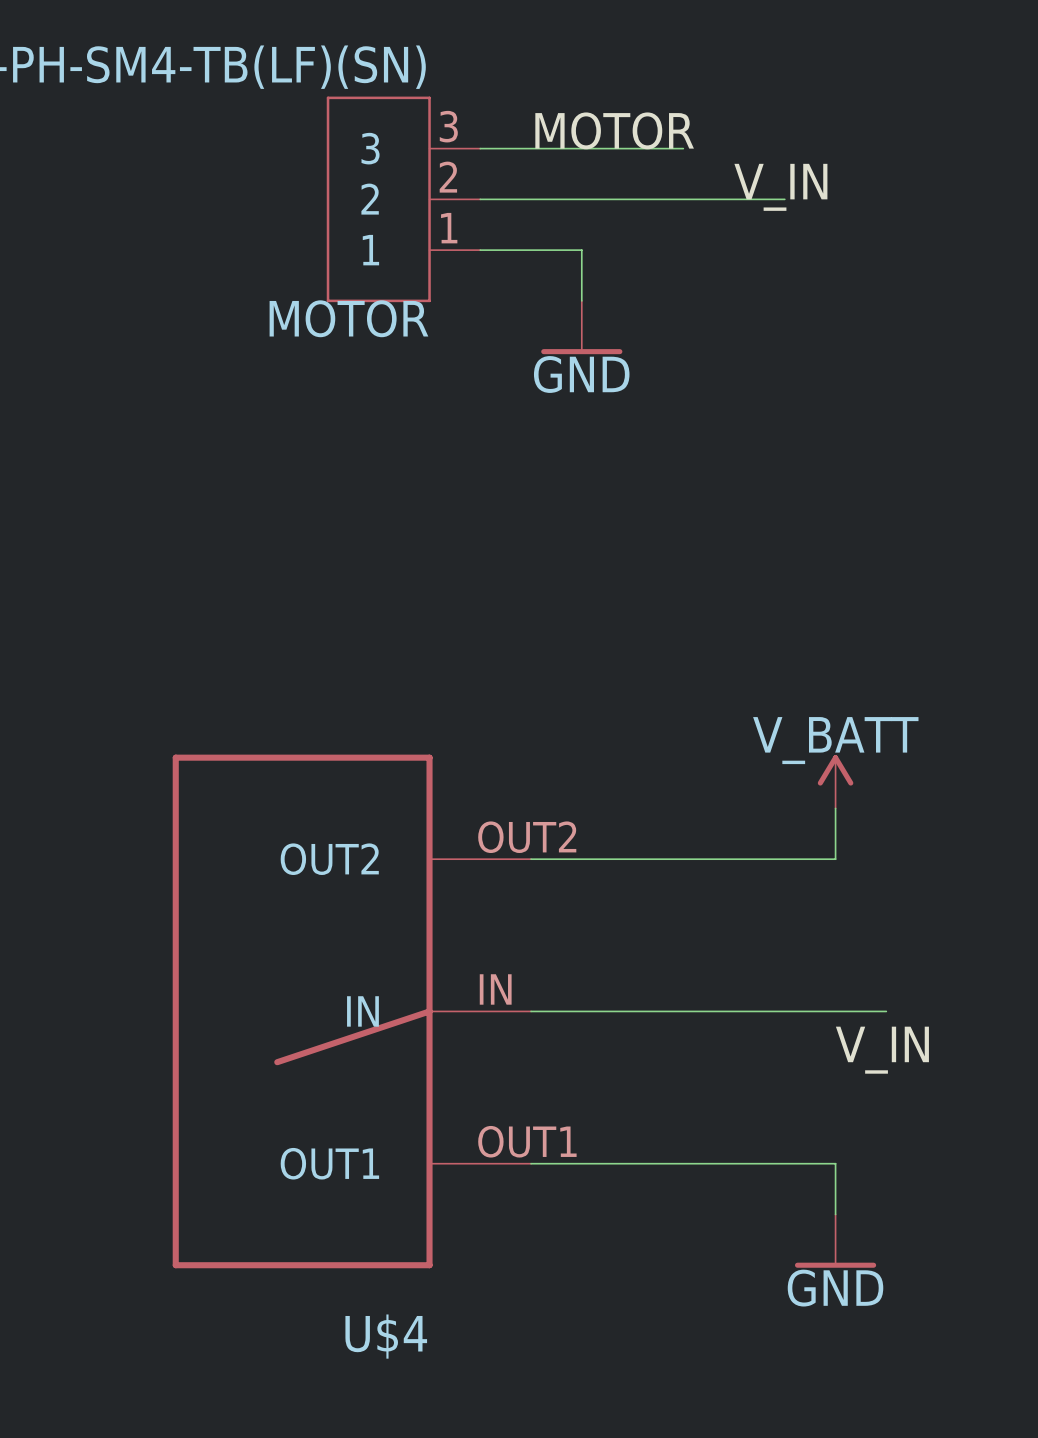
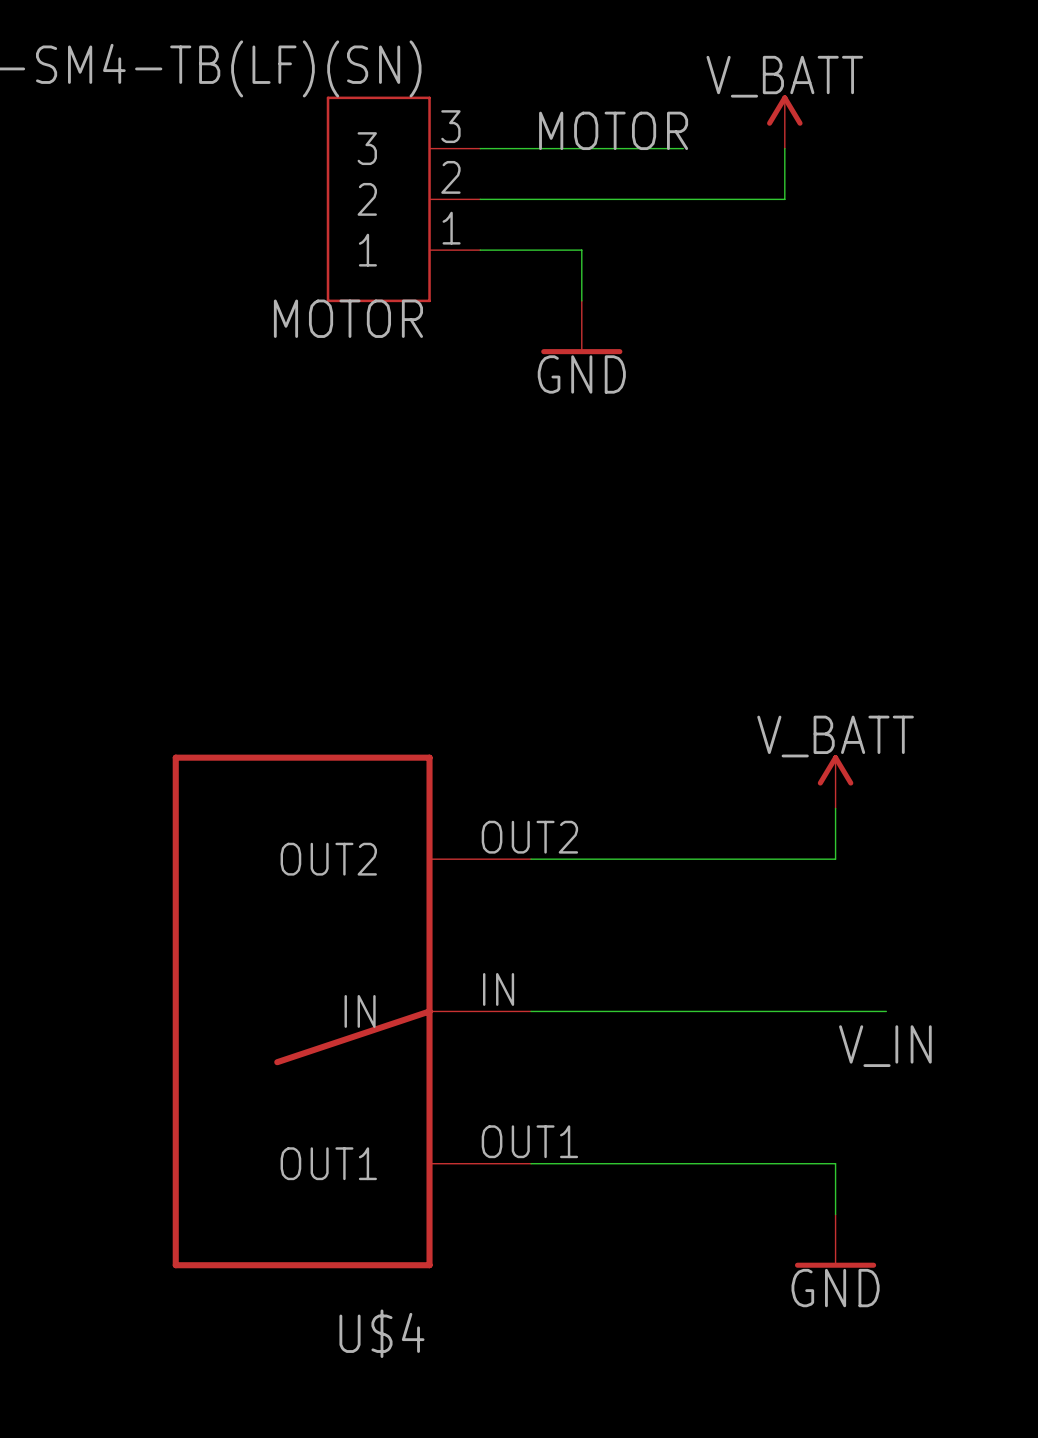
power symbol: none -> V_BATT (784, 121)
wire: none -> (784, 148) (784, 199)
label: V_IN (780, 187) -> none

